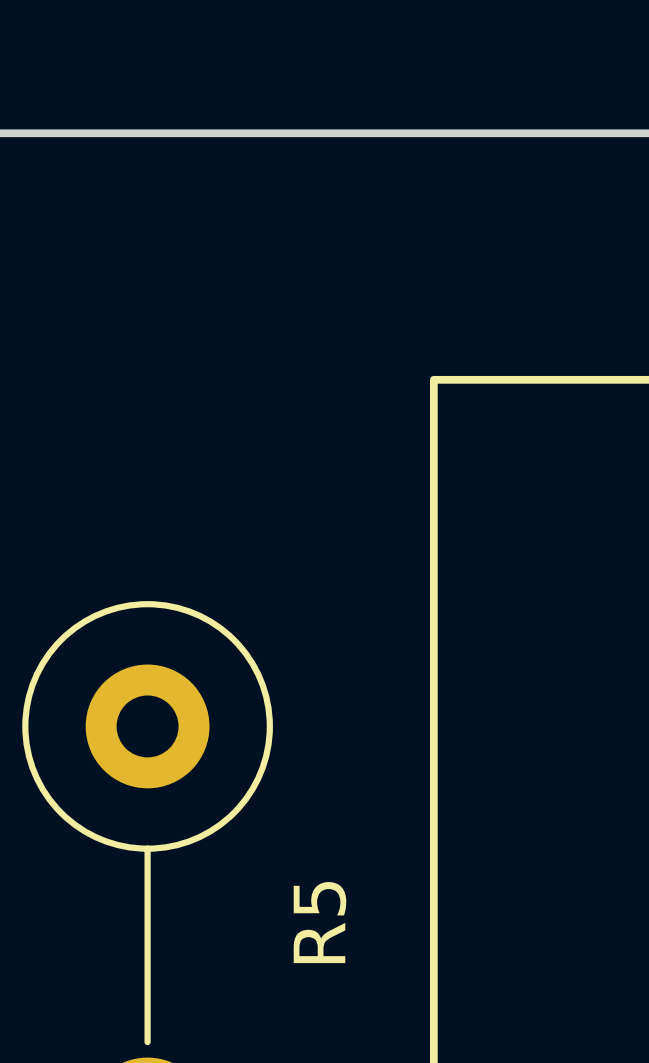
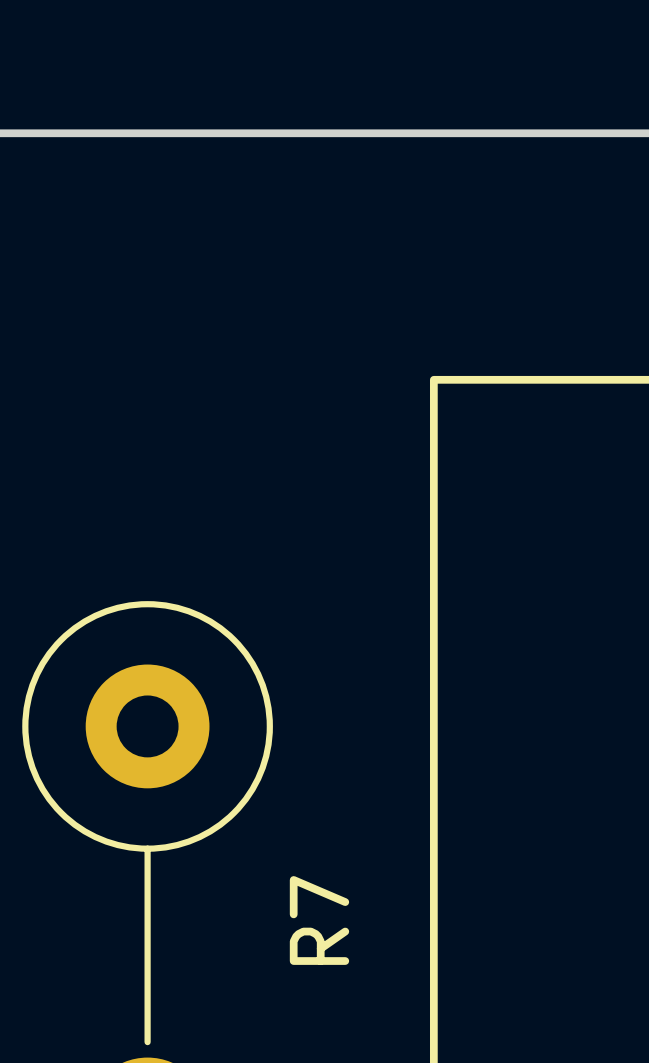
R5 name: R5 (319, 922) -> R7 (319, 920)

